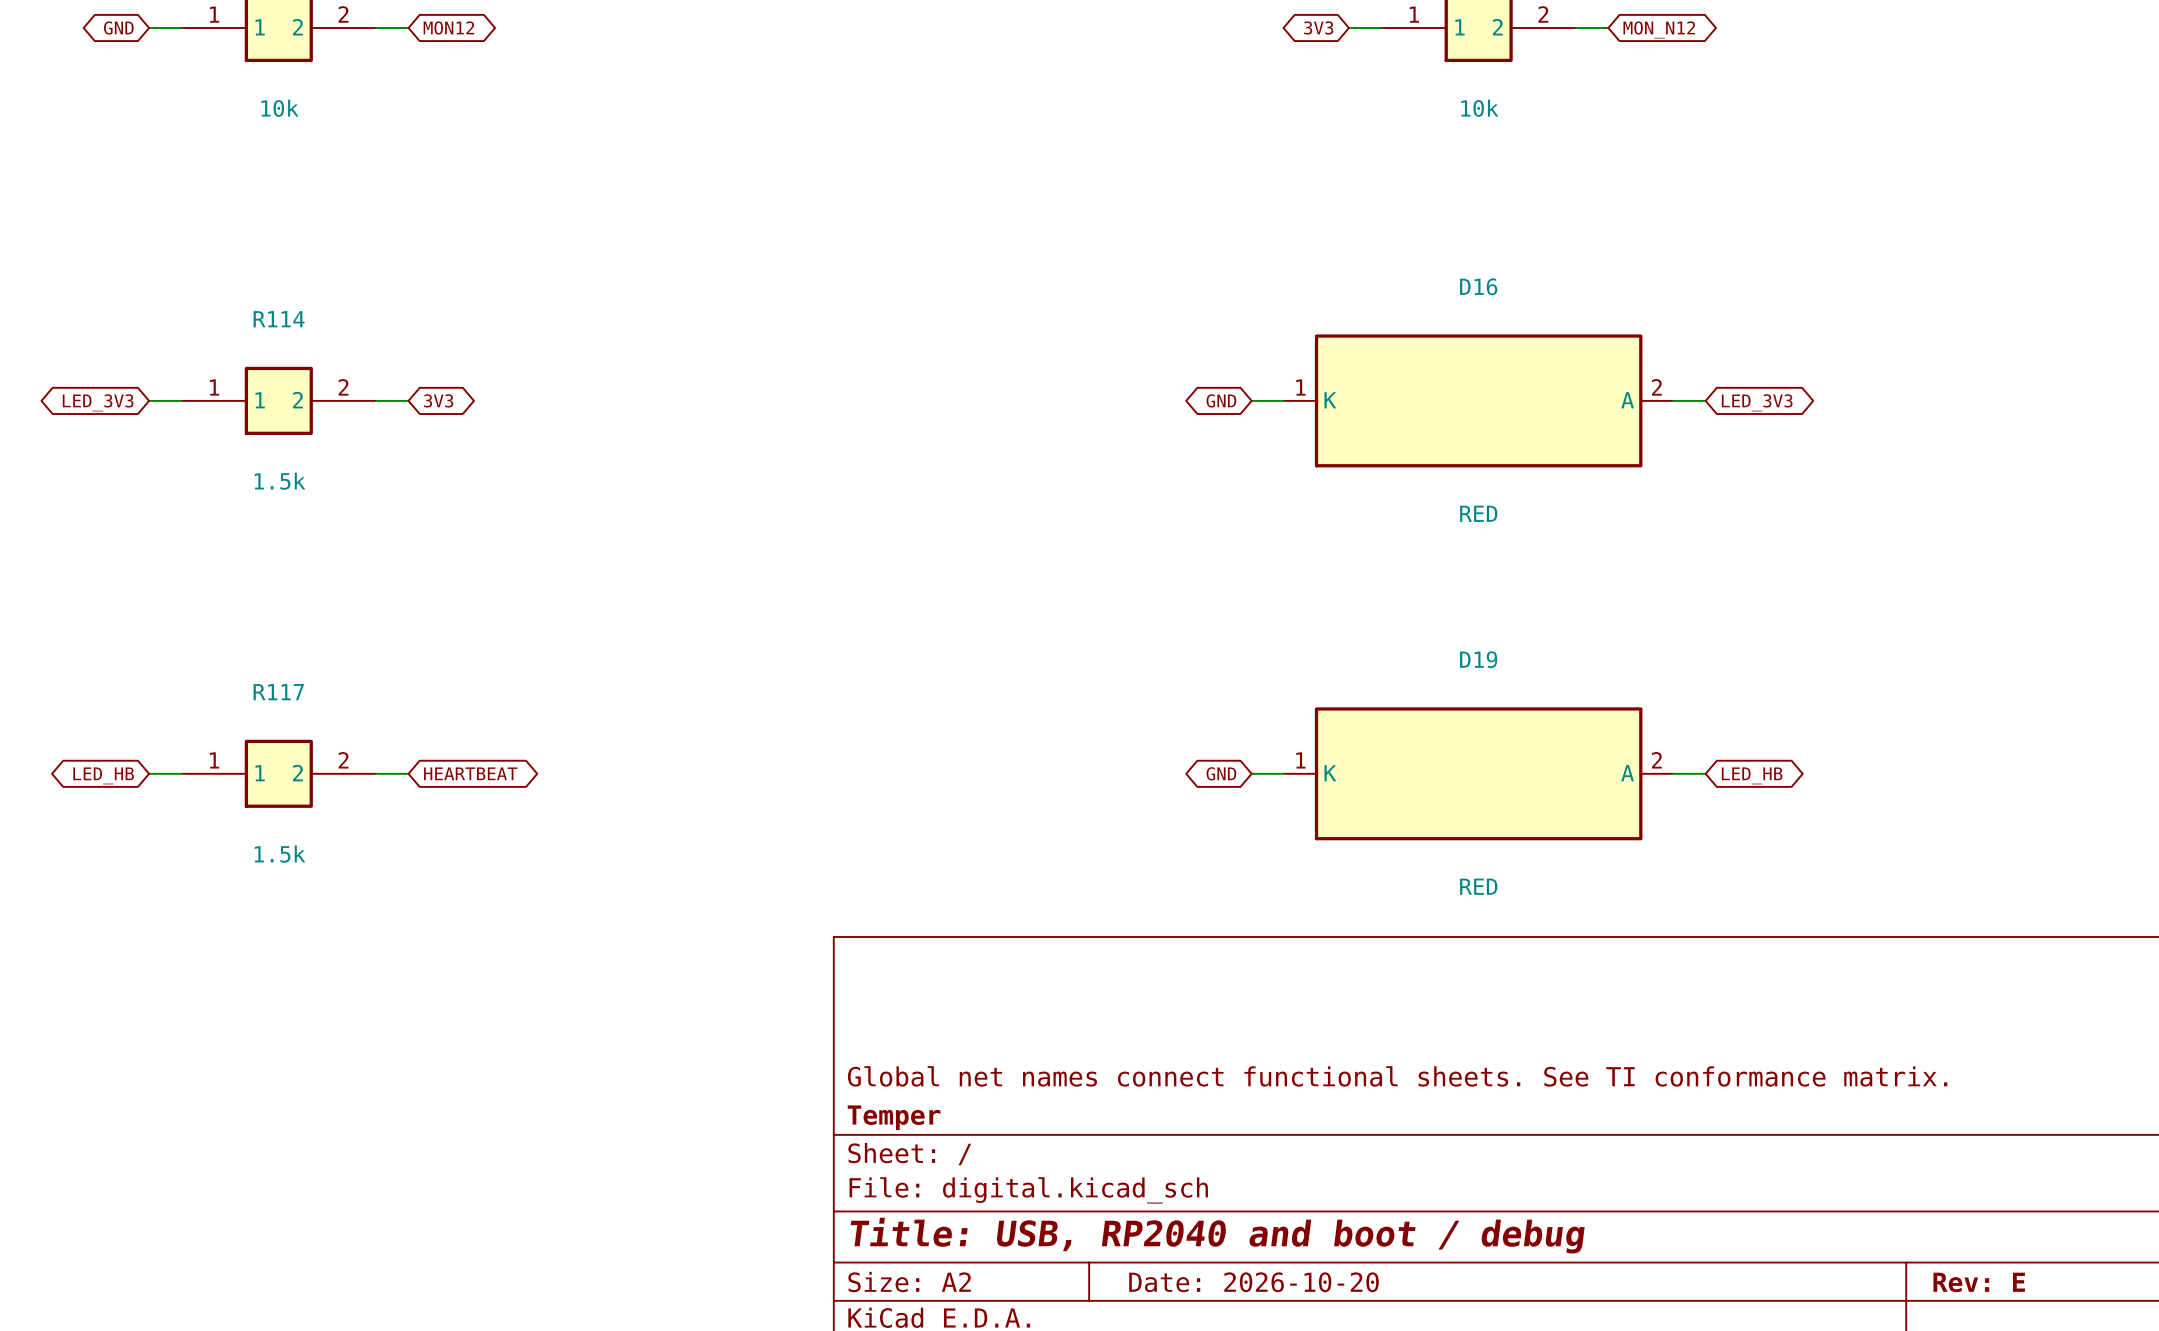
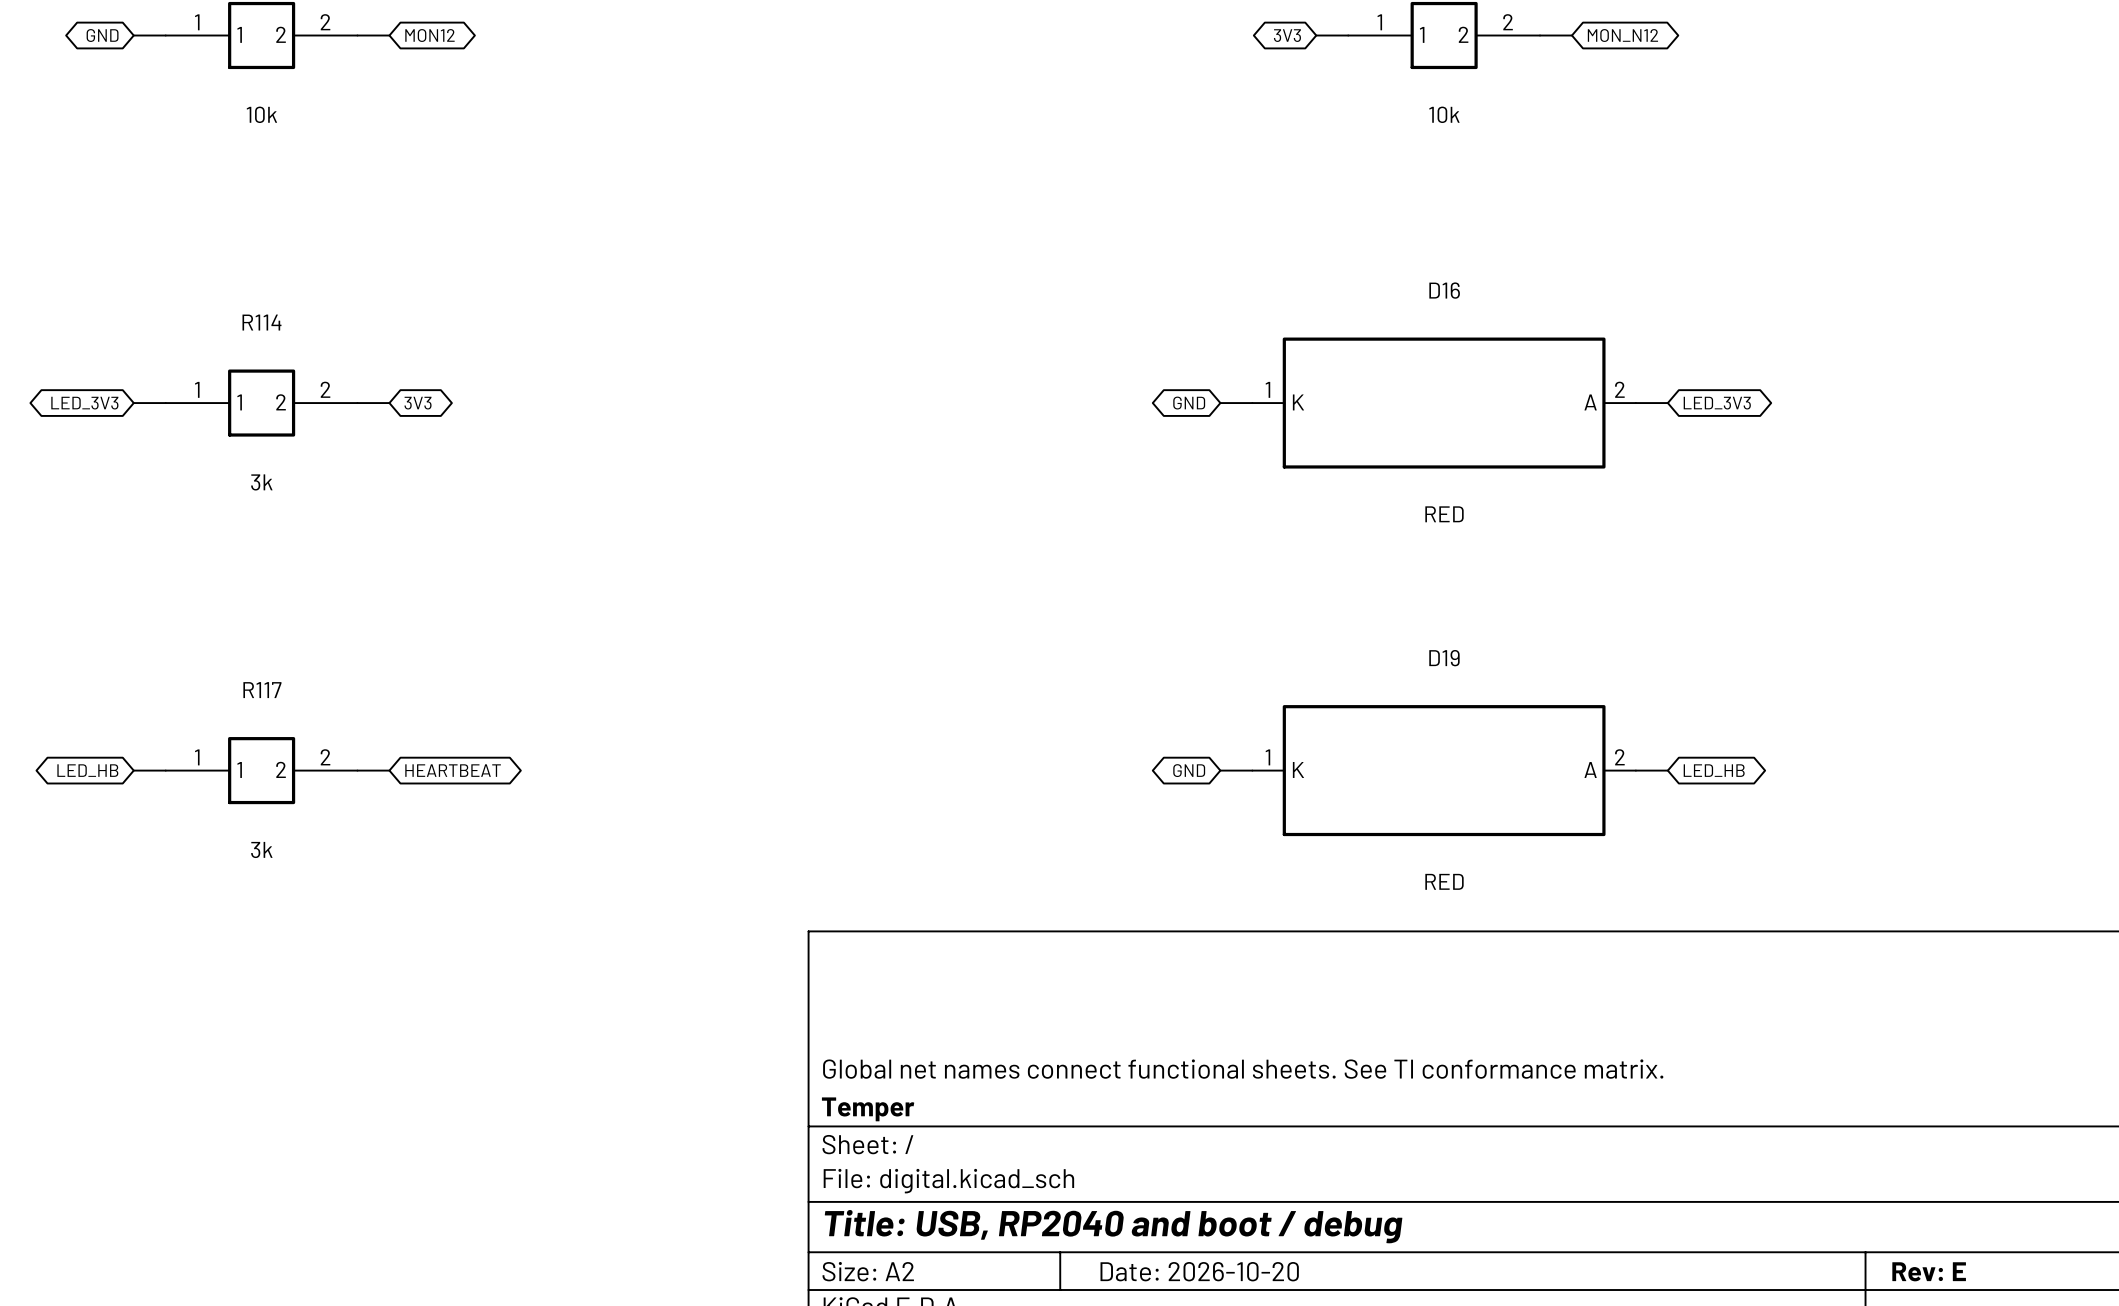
R114 value: 1.5k (279, 481) -> 3k (261, 482)
R117 value: 1.5k (279, 854) -> 3k (261, 849)

